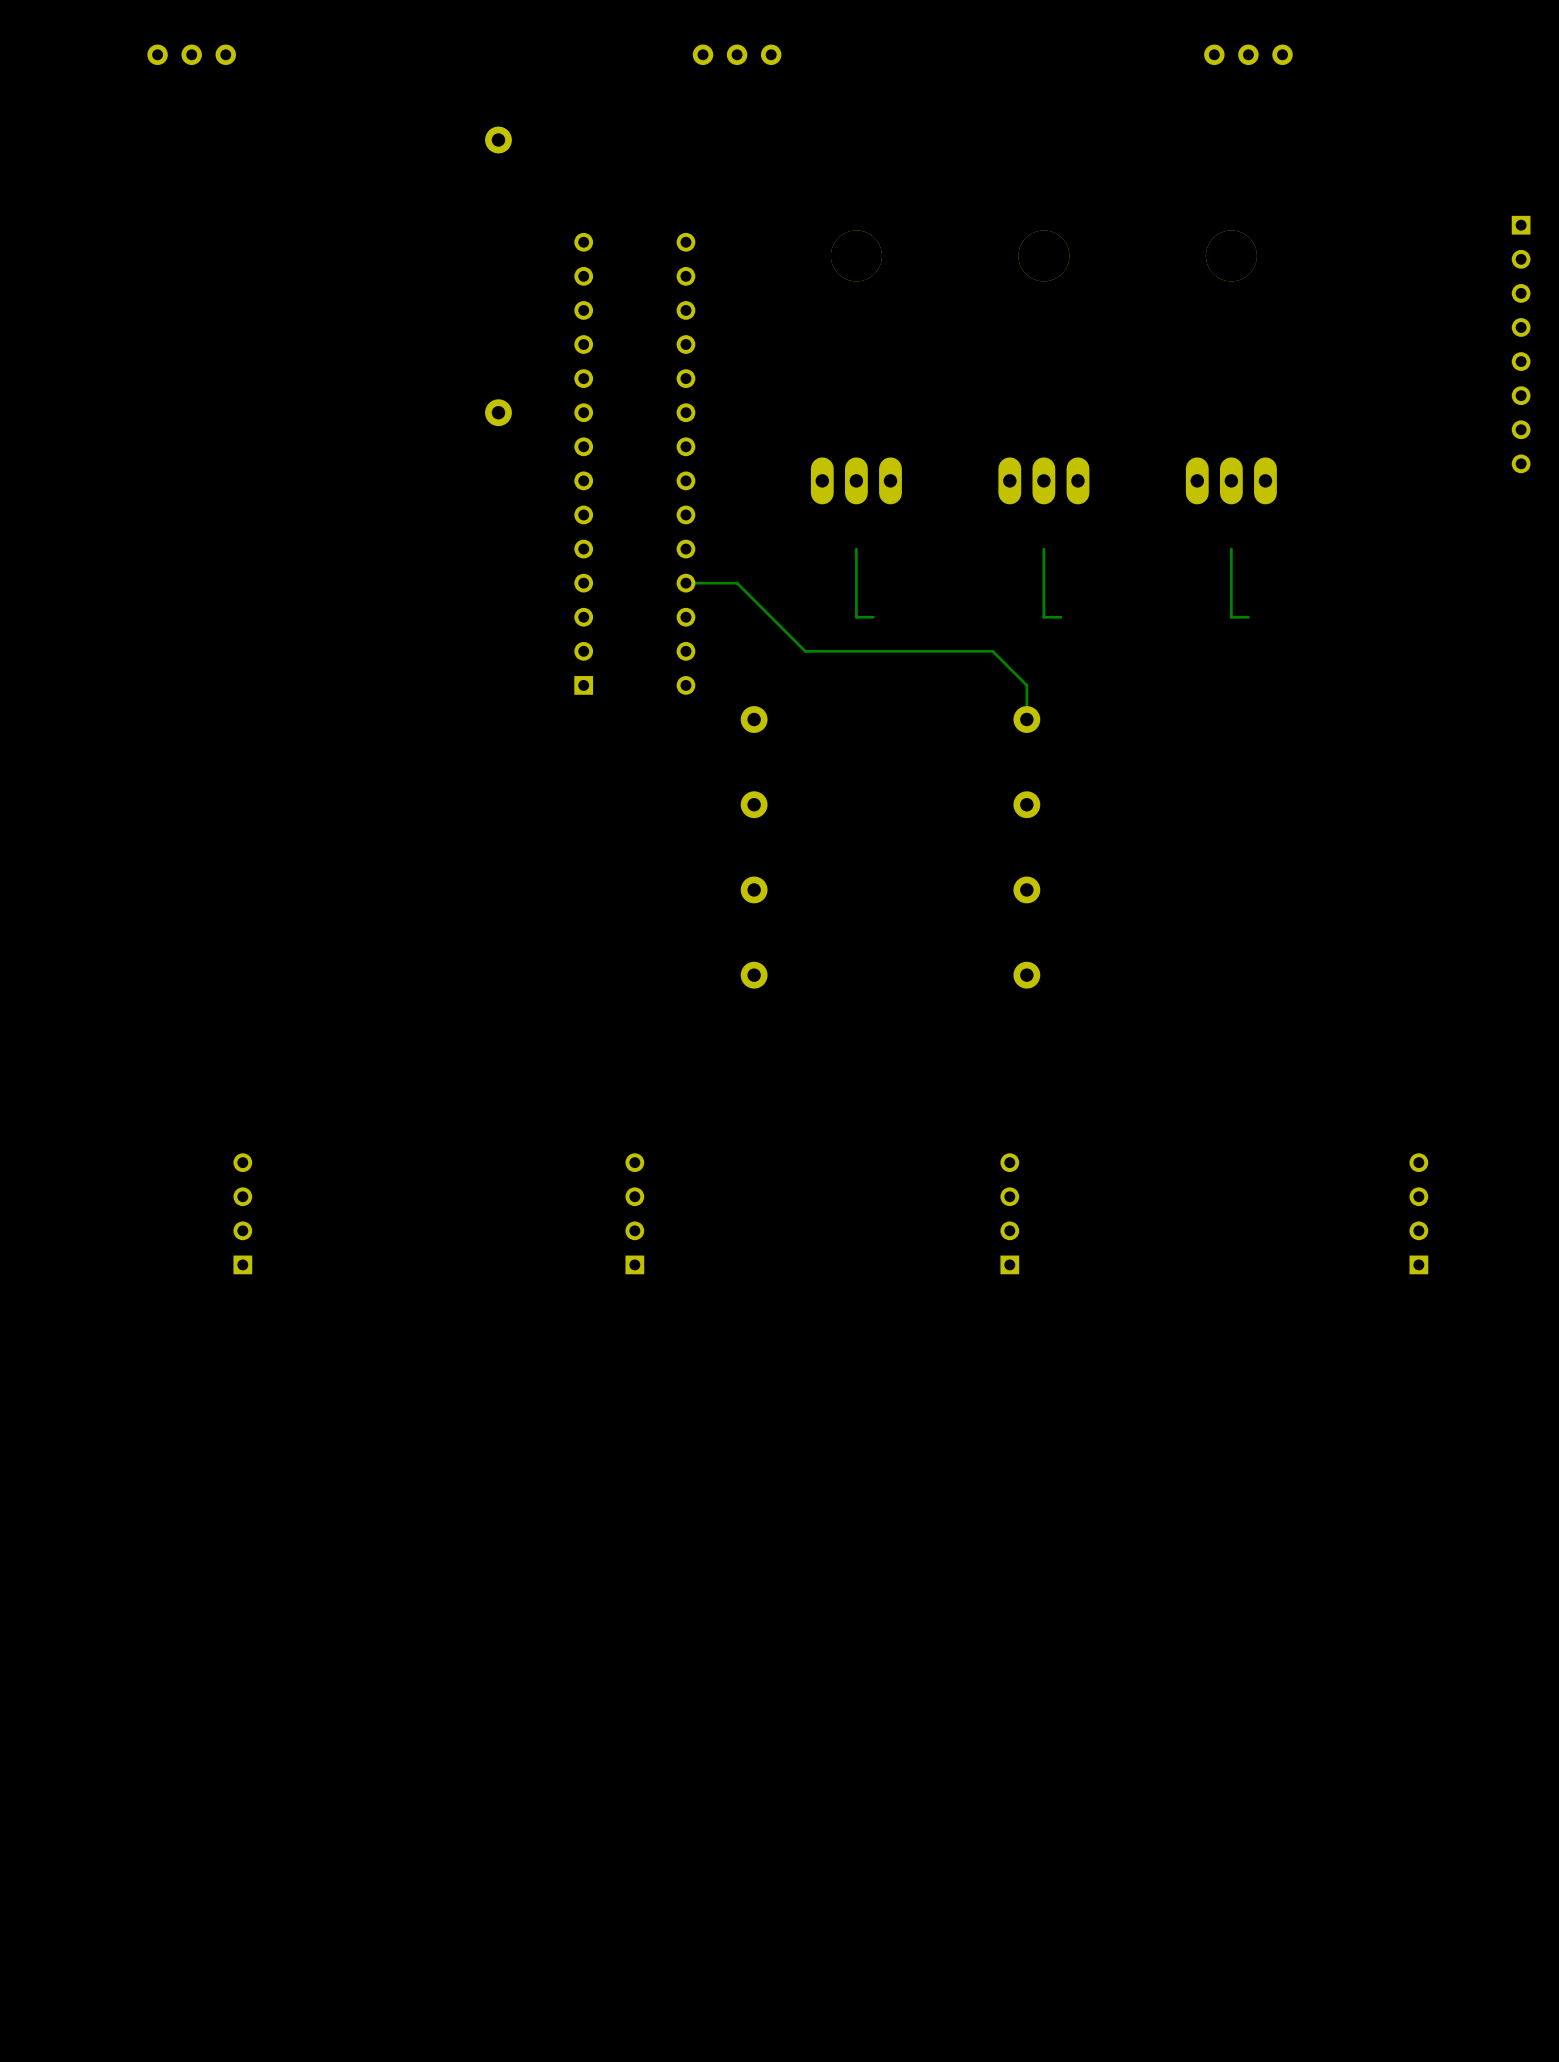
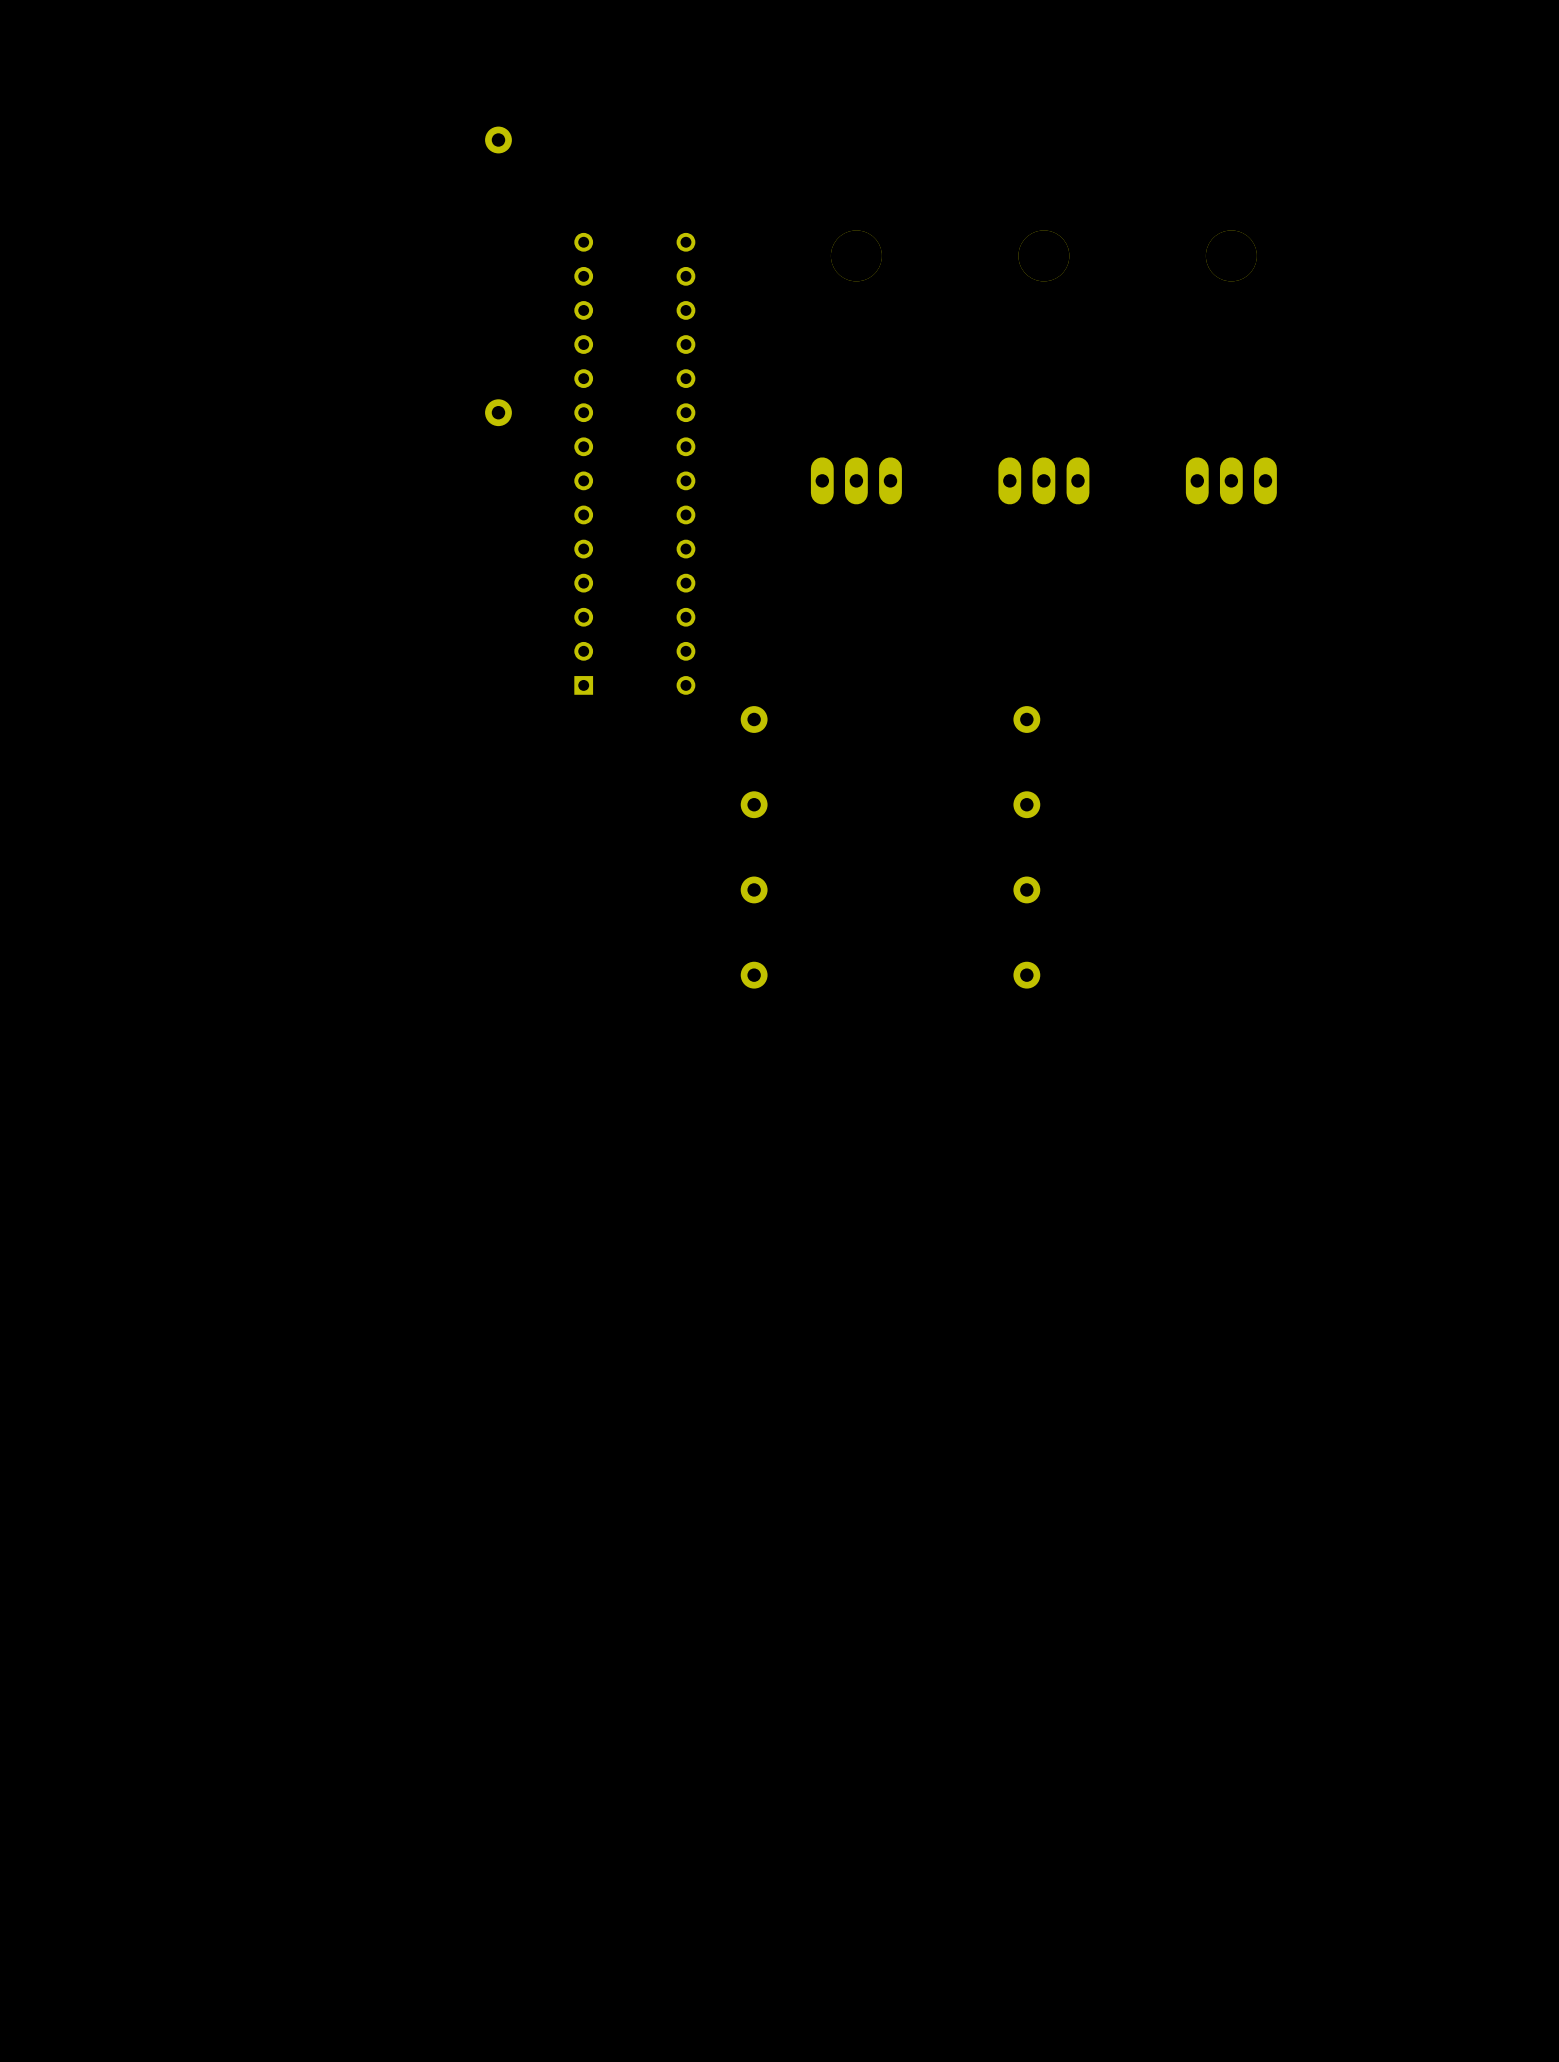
part: (191, 54) -> none
part: (737, 54) -> none
part: (1248, 54) -> none
part: (1521, 344) -> none
track: (856, 549) (856, 617) (873, 617) -> none
track: (1043, 549) (1043, 617) (1060, 617) -> none
track: (1231, 549) (1231, 617) (1248, 617) -> none
track: (685, 583) (737, 583) (805, 651) (992, 651) (1026, 685) (1026, 719) -> none
part: (242, 1213) -> none
part: (634, 1213) -> none
part: (1009, 1213) -> none
part: (1418, 1213) -> none

